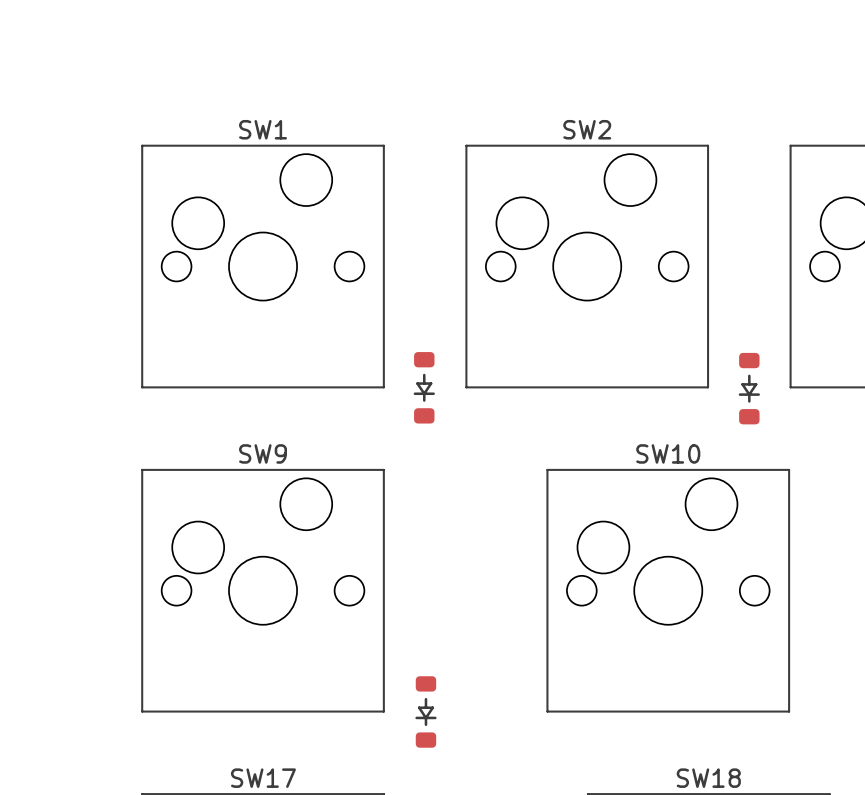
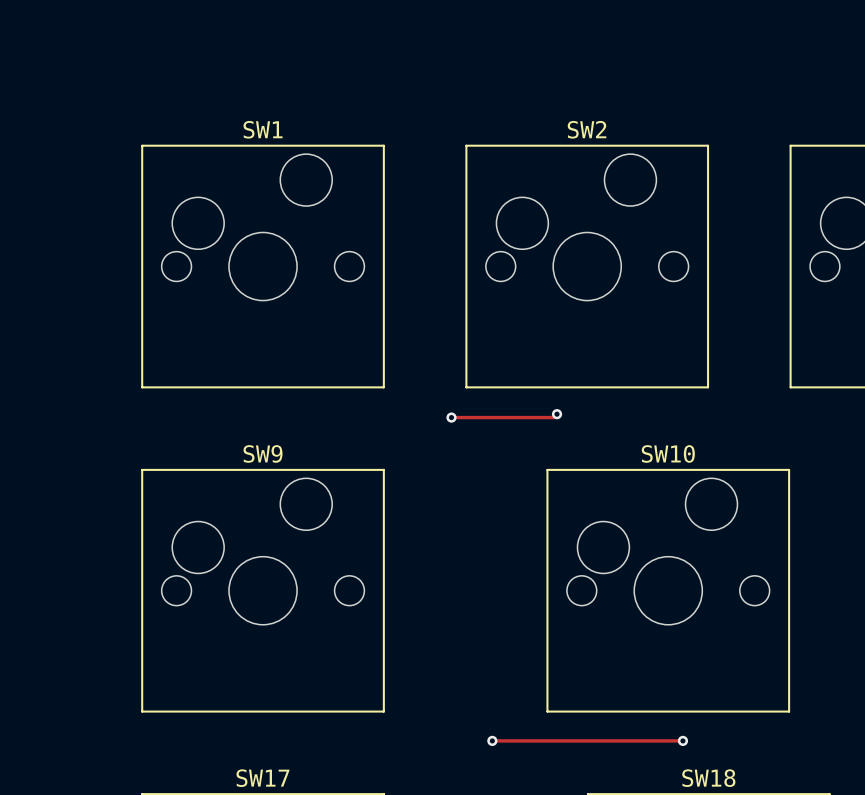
part: (424, 387) -> none
part: (749, 388) -> none
track: none -> (557, 414) (553, 417) (451, 417)
via: none -> (557, 414)
via: none -> (451, 417)
part: (425, 711) -> none
track: none -> (492, 740) (682, 740)
via: none -> (492, 740)
via: none -> (682, 740)

